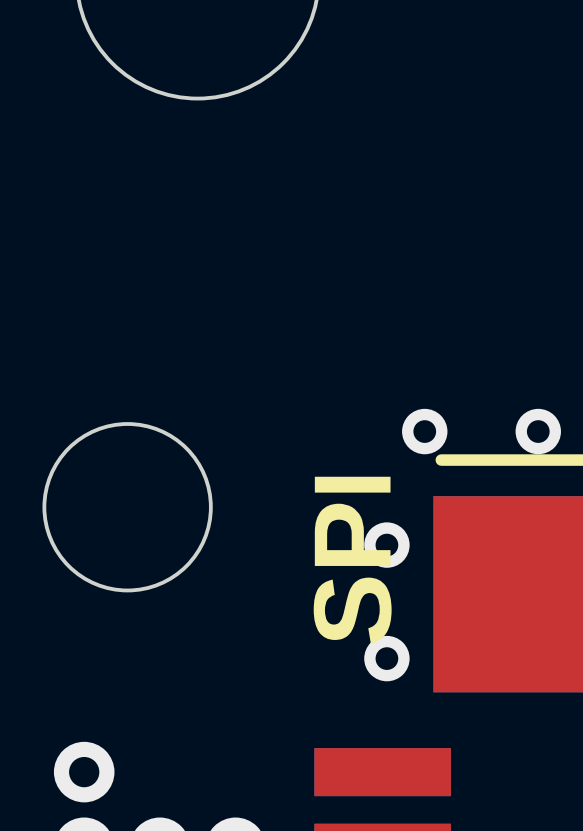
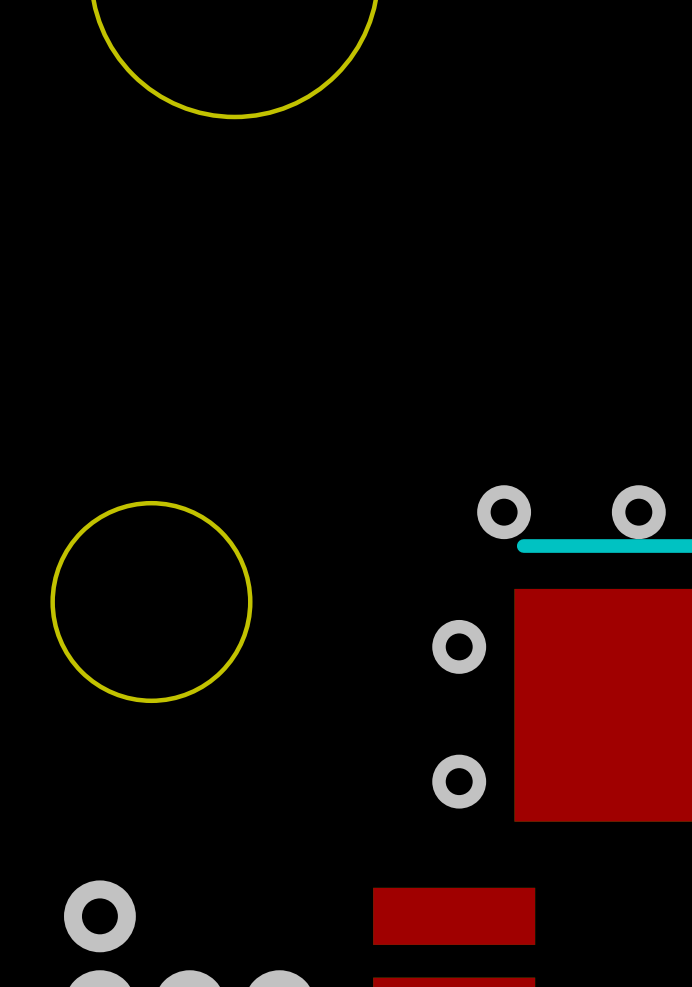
text: SPI (352, 560) -> none

